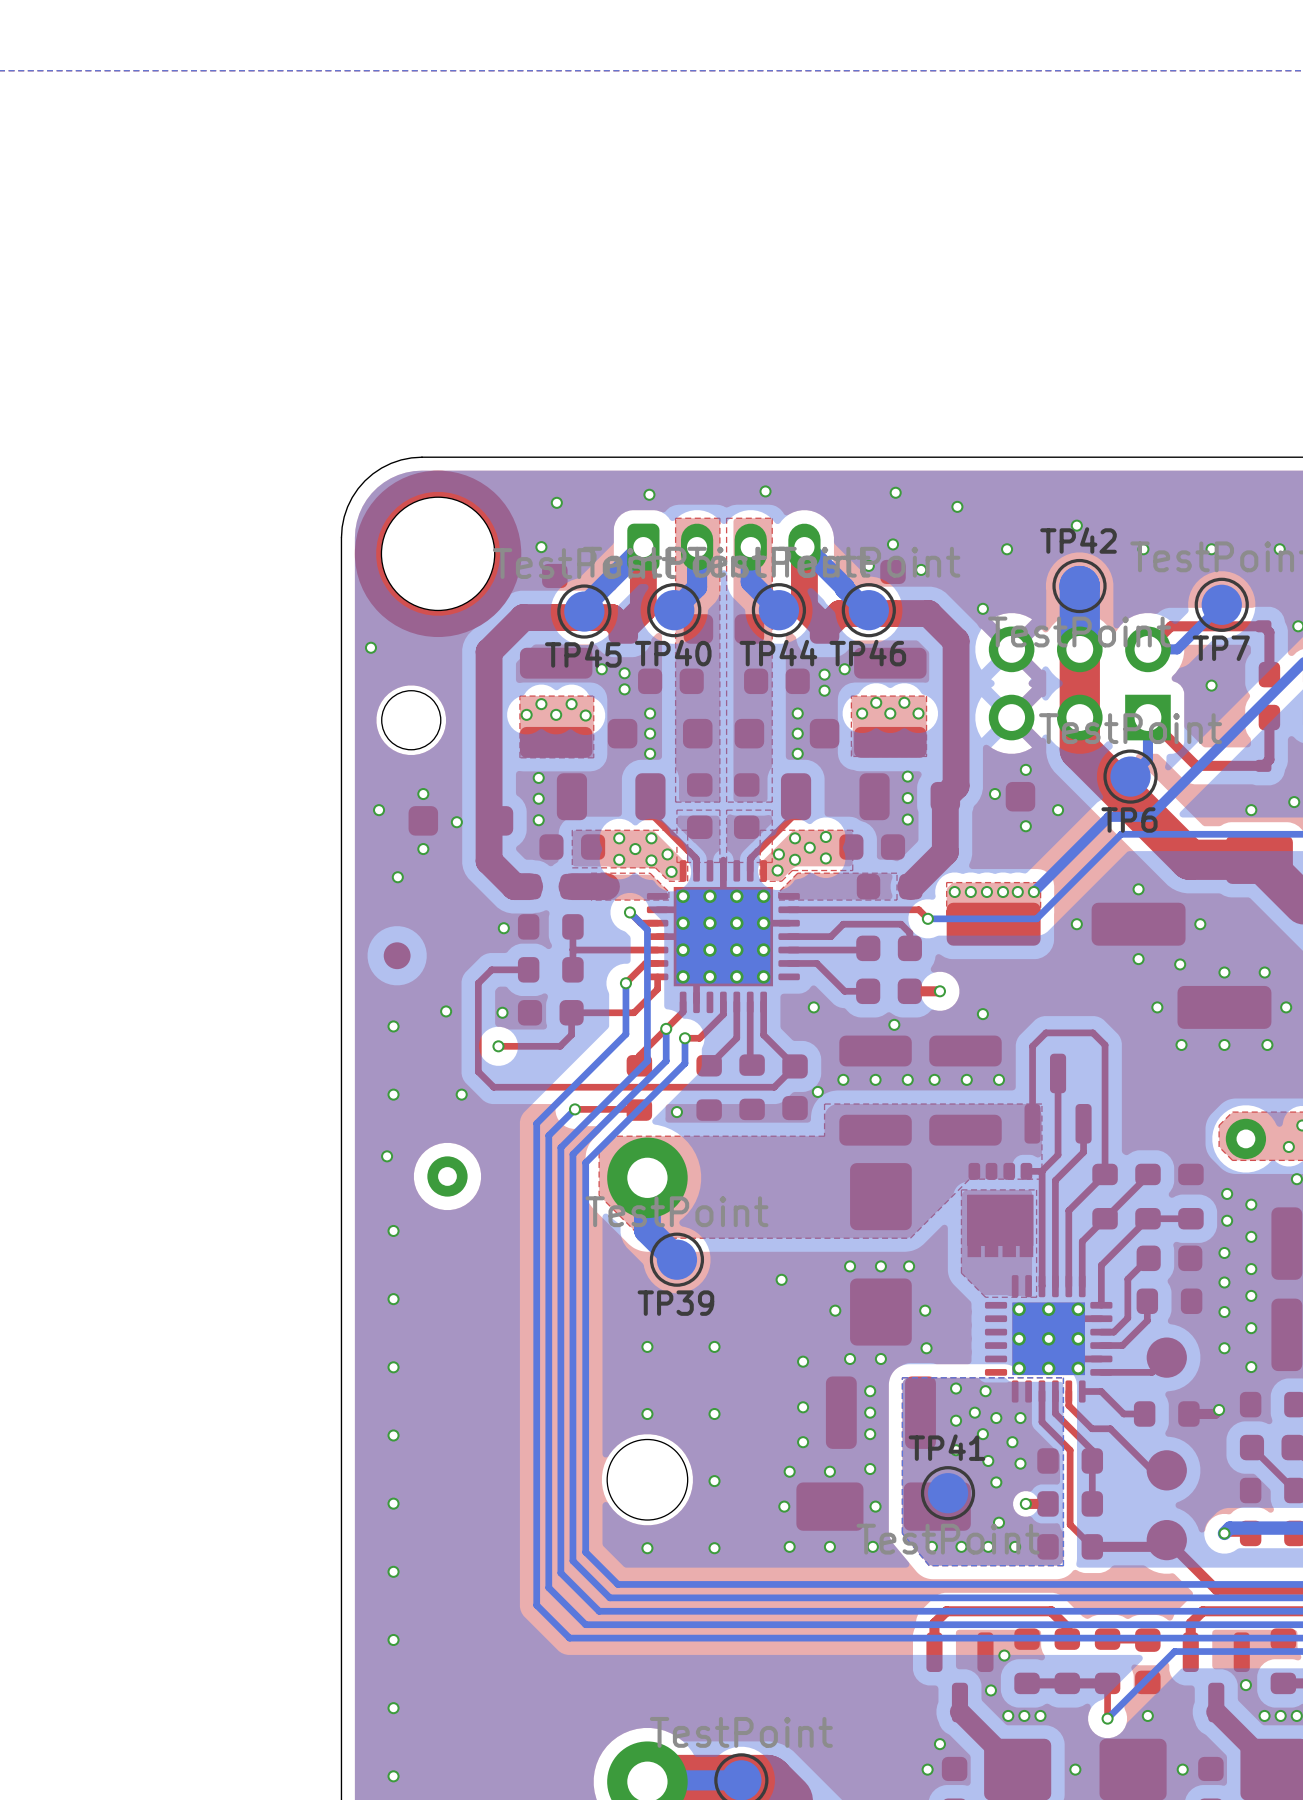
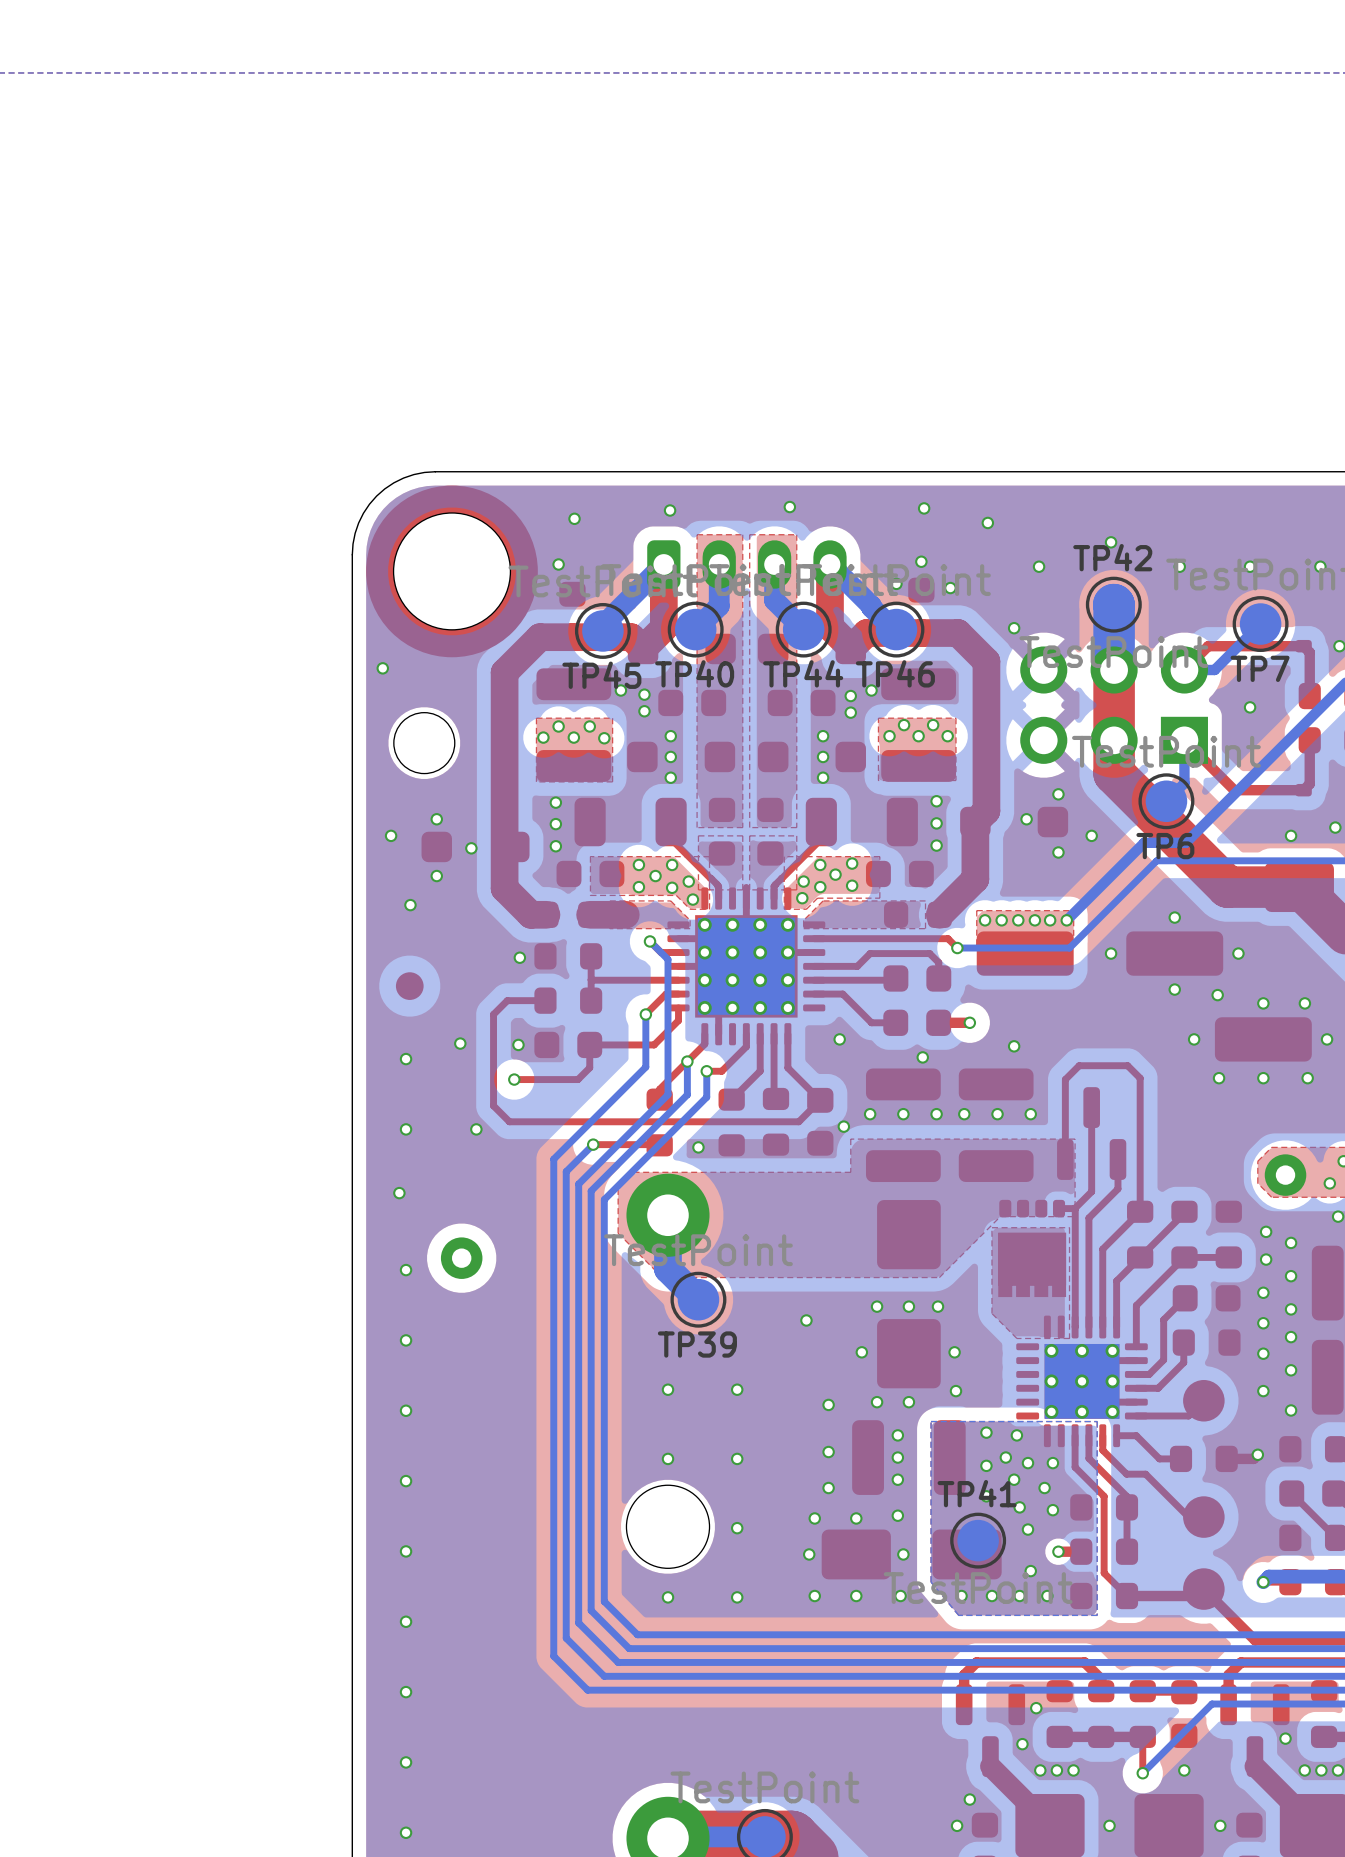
part position: (447, 1176) -> (461, 1258)

